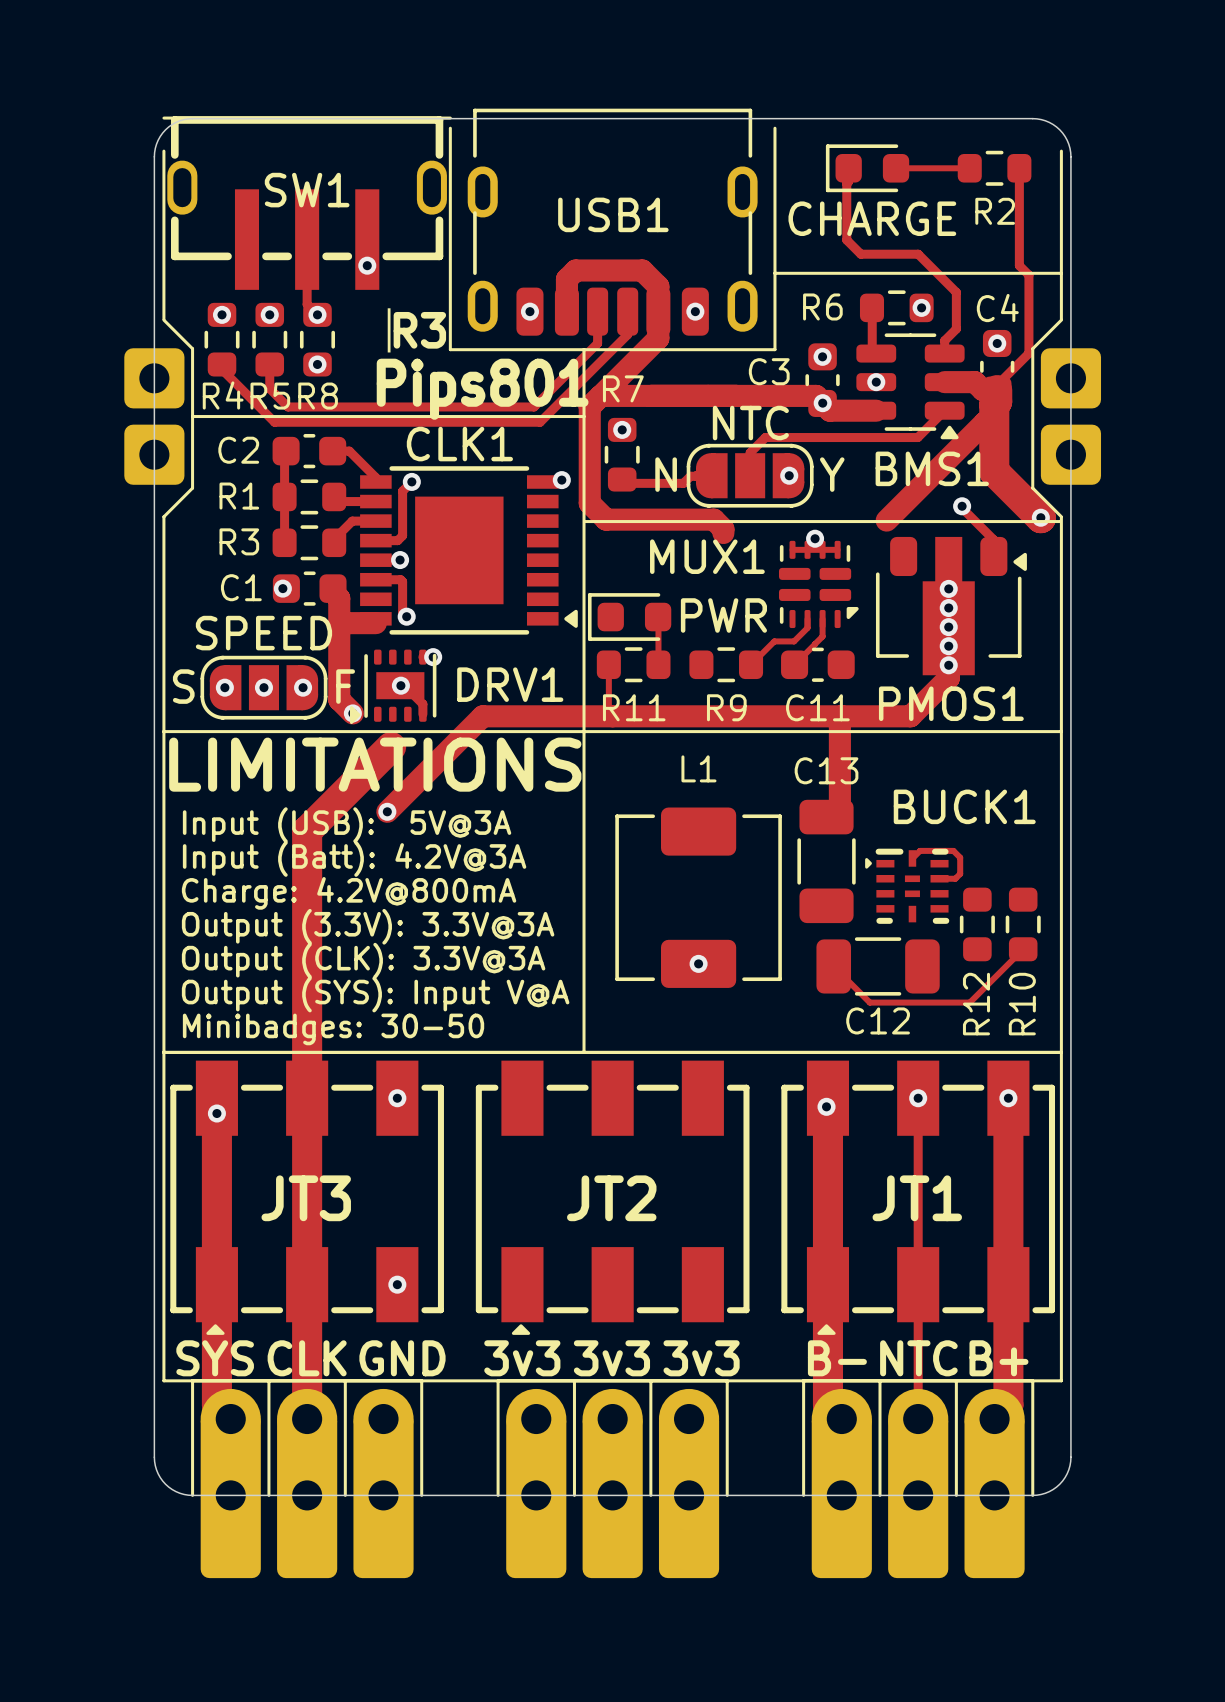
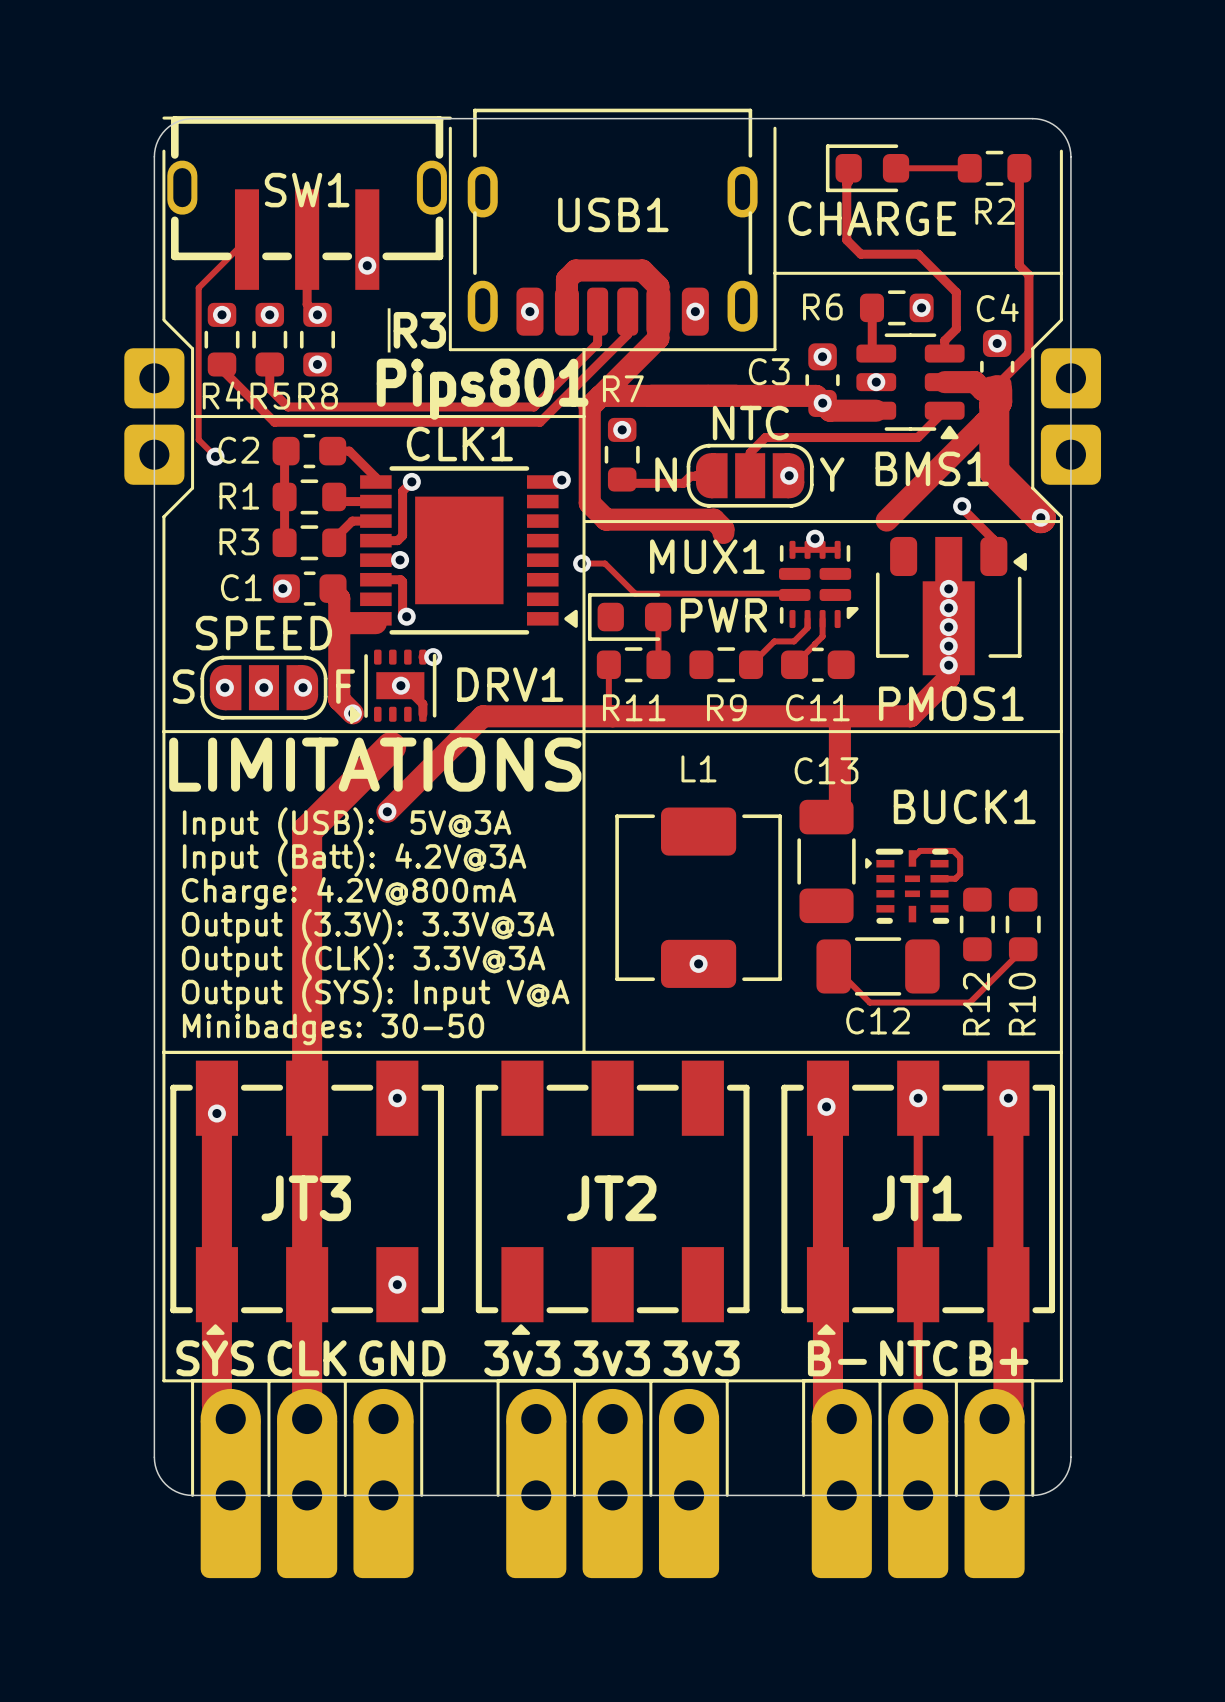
track: none -> (246, 239) (198, 287) (198, 439) (215, 456)
via: none -> (215, 456)
track: none -> (582, 563) (605, 563) (635, 593) (794, 594)
via: none -> (582, 563)

